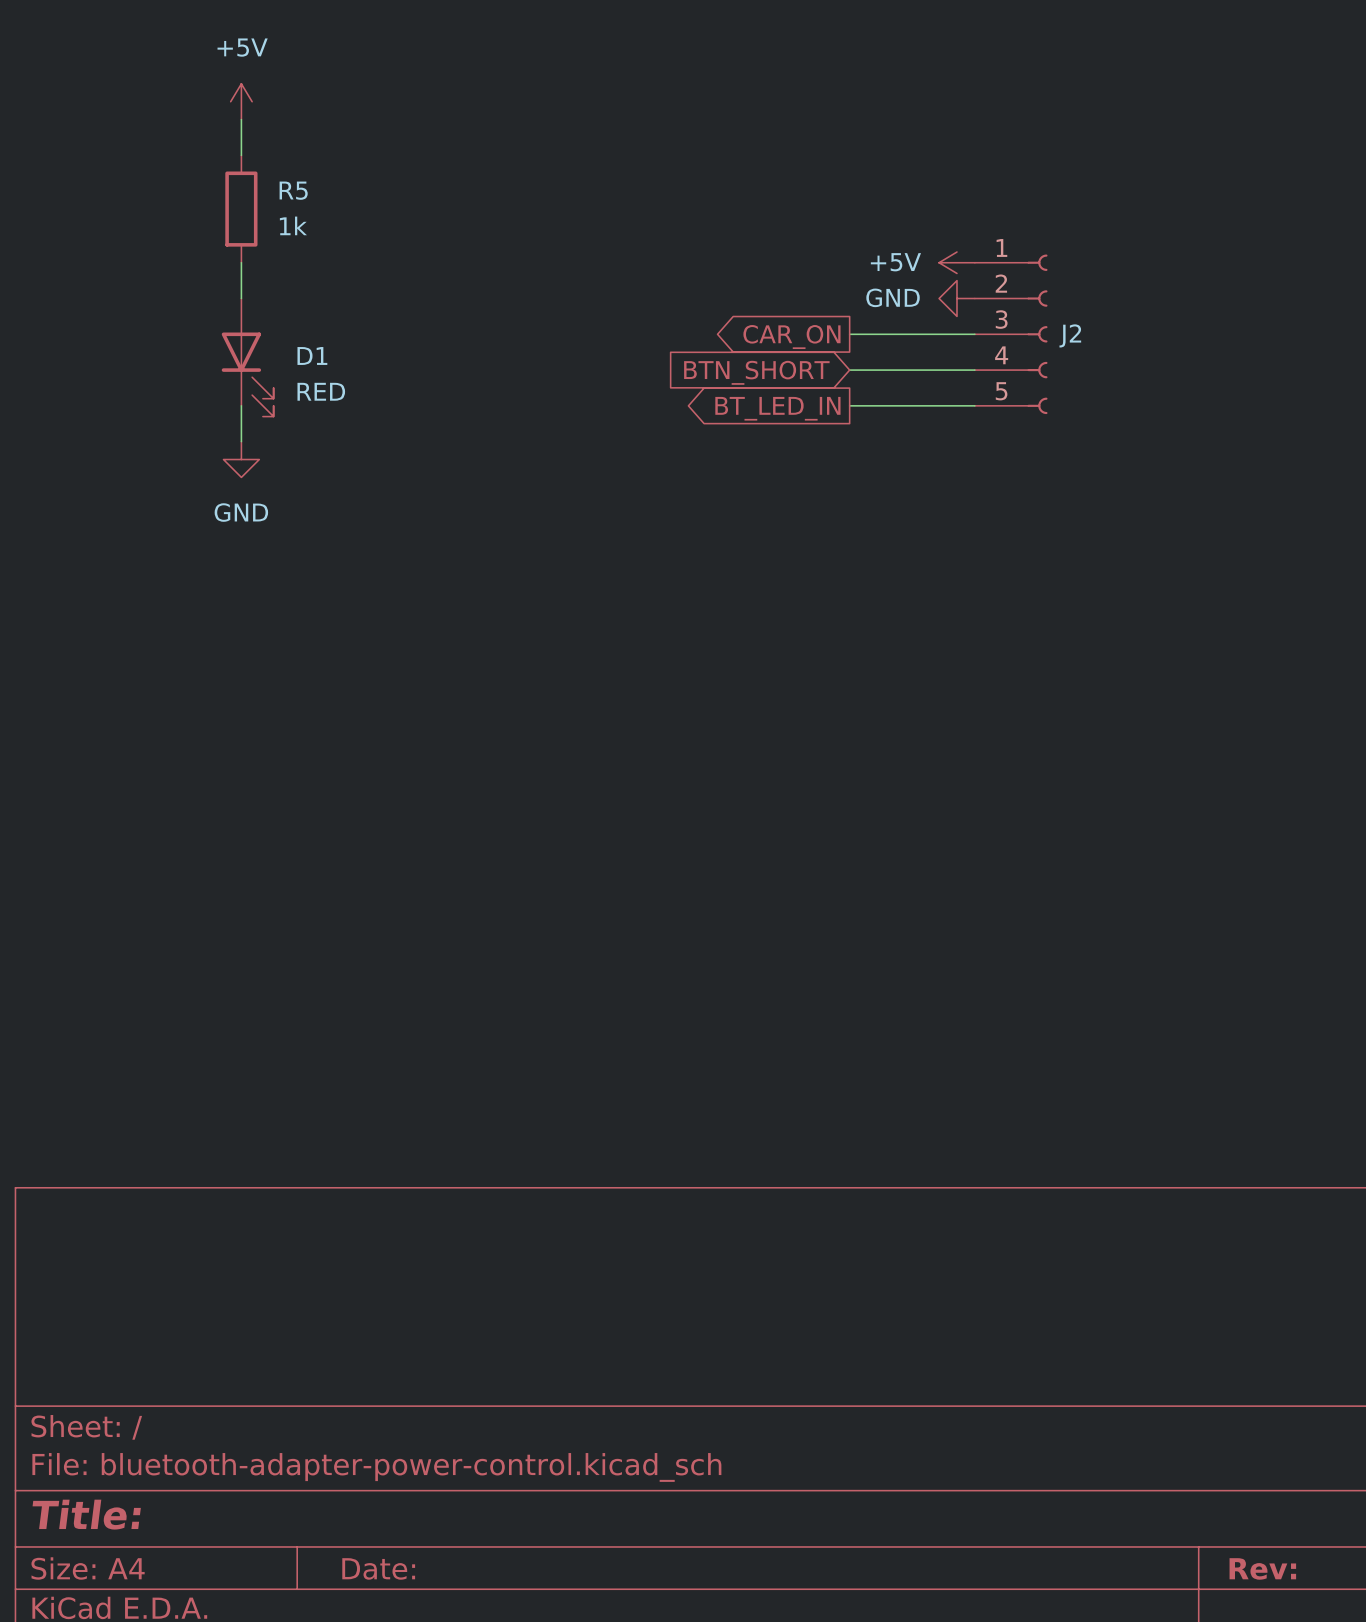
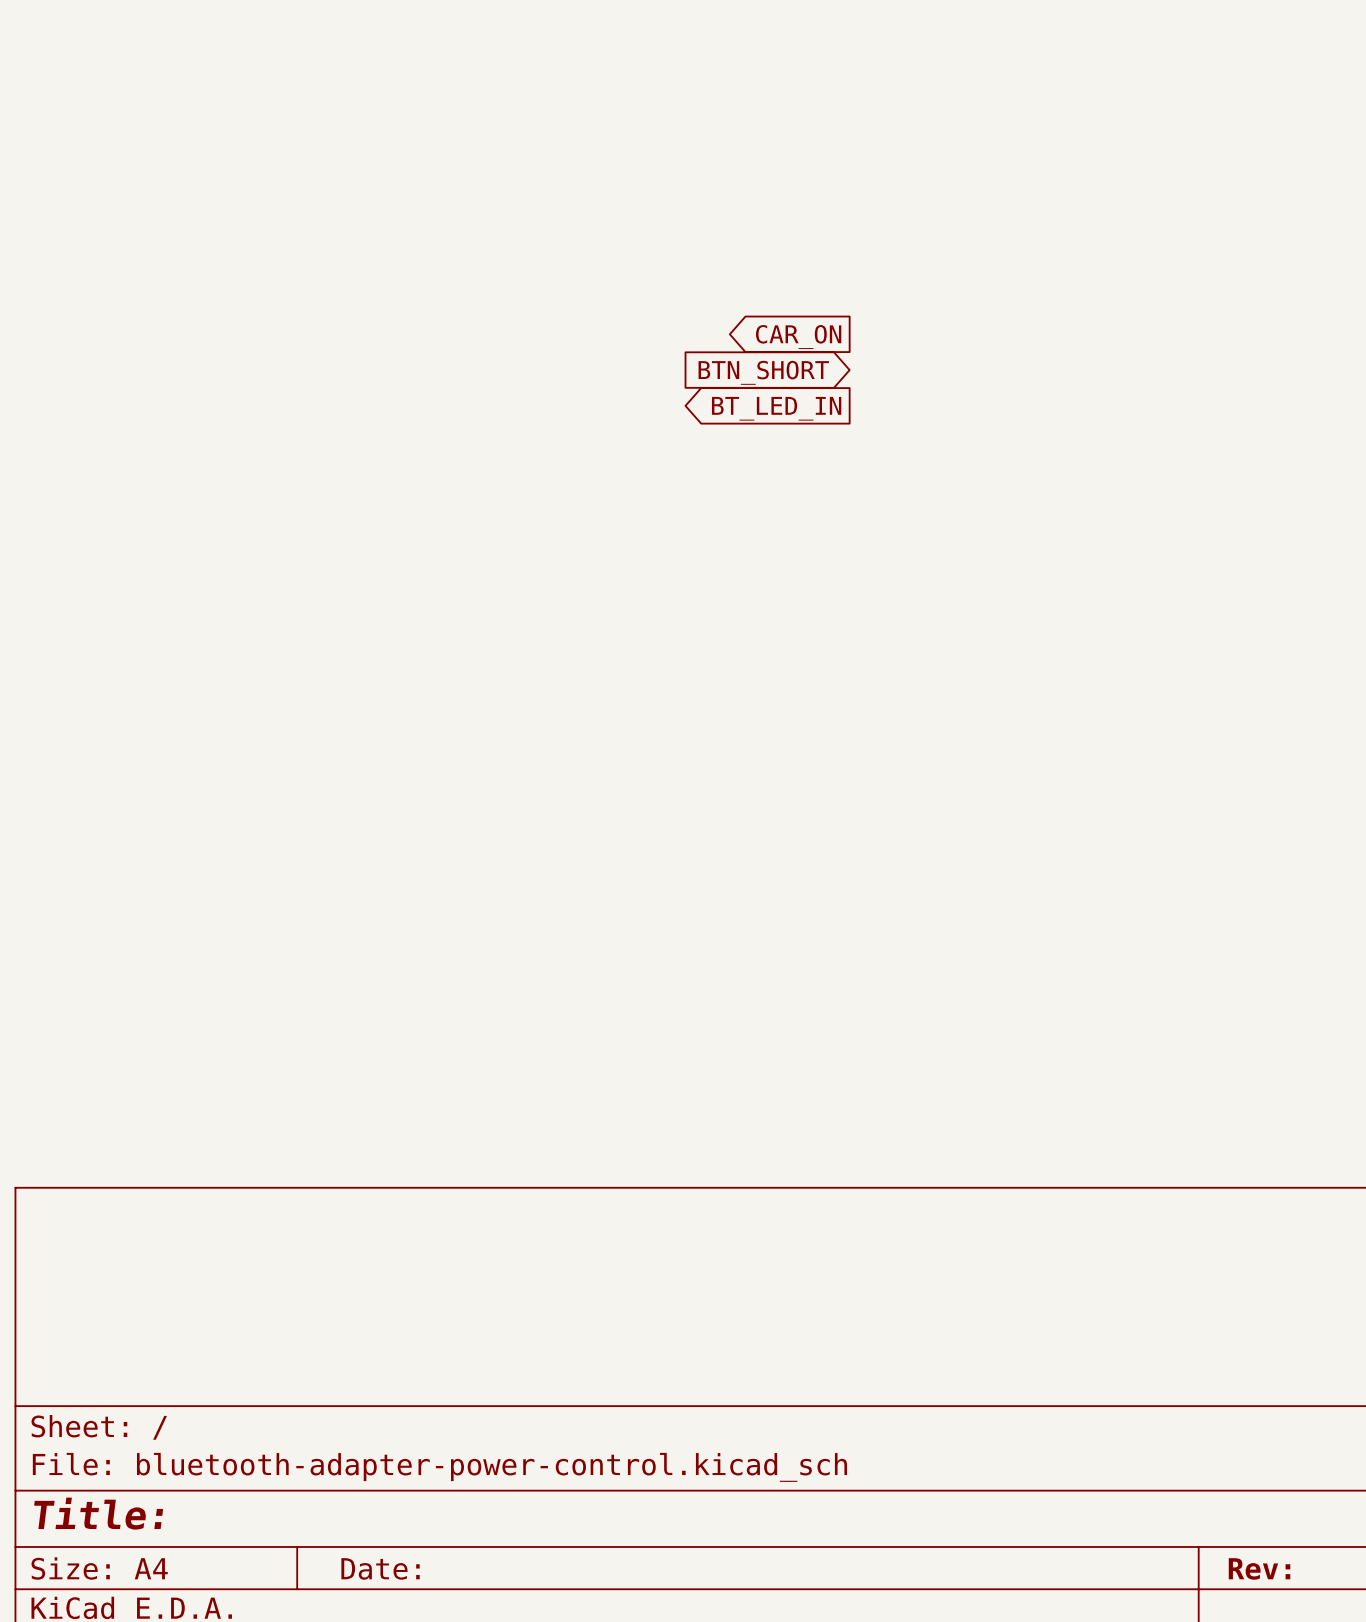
power symbol: +5V (241, 101) -> none
wire: (241, 119) (241, 155) -> none
R5: 1k (241, 209) -> none
wire: (241, 262) (241, 298) -> none
power symbol: +5V (956, 262) -> none
power symbol: GND (956, 298) -> none
wire: (849, 334) (974, 334) -> none
J2: (1011, 334) -> none
D1: RED (247, 357) -> none
wire: (849, 370) (974, 370) -> none
wire: (241, 405) (241, 441) -> none
wire: (849, 405) (974, 405) -> none
power symbol: GND (241, 459) -> none

